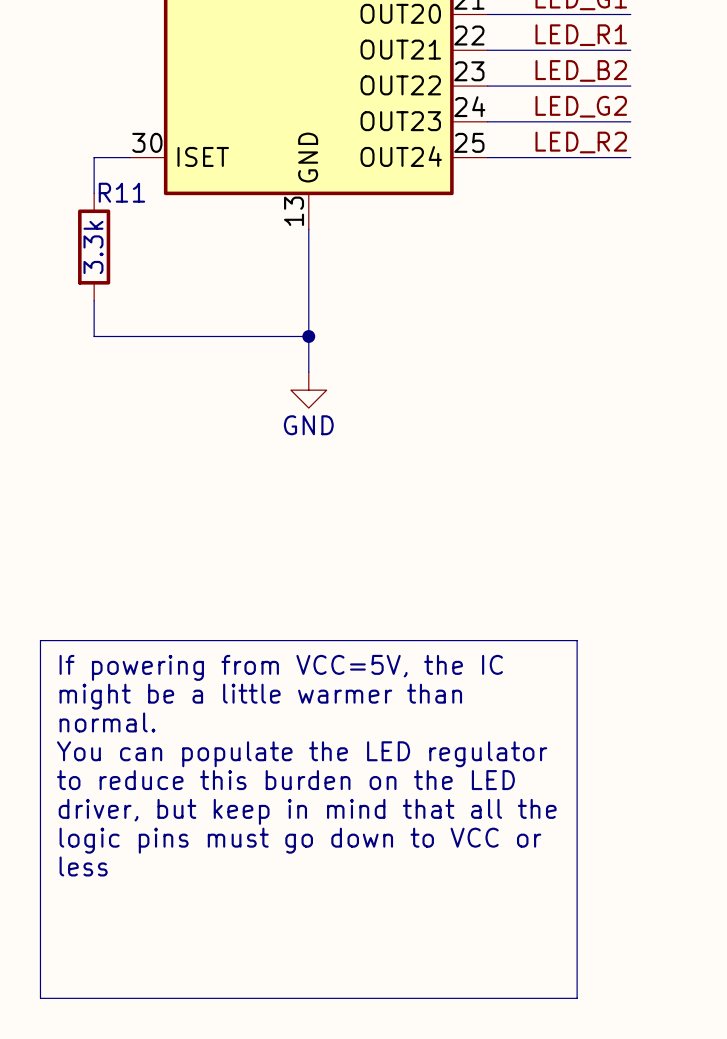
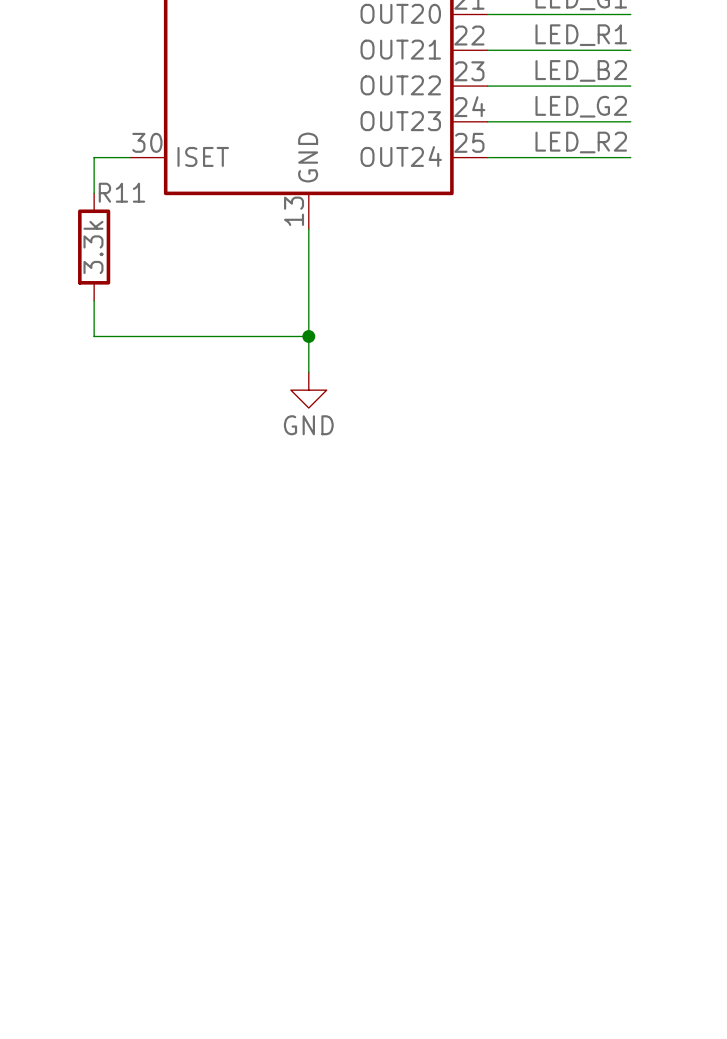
line: (40, 640) (577, 640) (577, 998) (40, 998) (40, 640) -> none
text: If powering from VCC=5V, the IC (281, 667) -> none
text: might be a little warmer than (260, 696) -> none
text: normal. (107, 722) -> none
text: You can populate the LED regulator (302, 754) -> none
text: to reduce this burden on the LED (285, 780) -> none
text: driver, but keep in mind that all the (307, 811) -> none
text: logic pins must go down to VCC or (300, 840) -> none
text: less (83, 866) -> none

